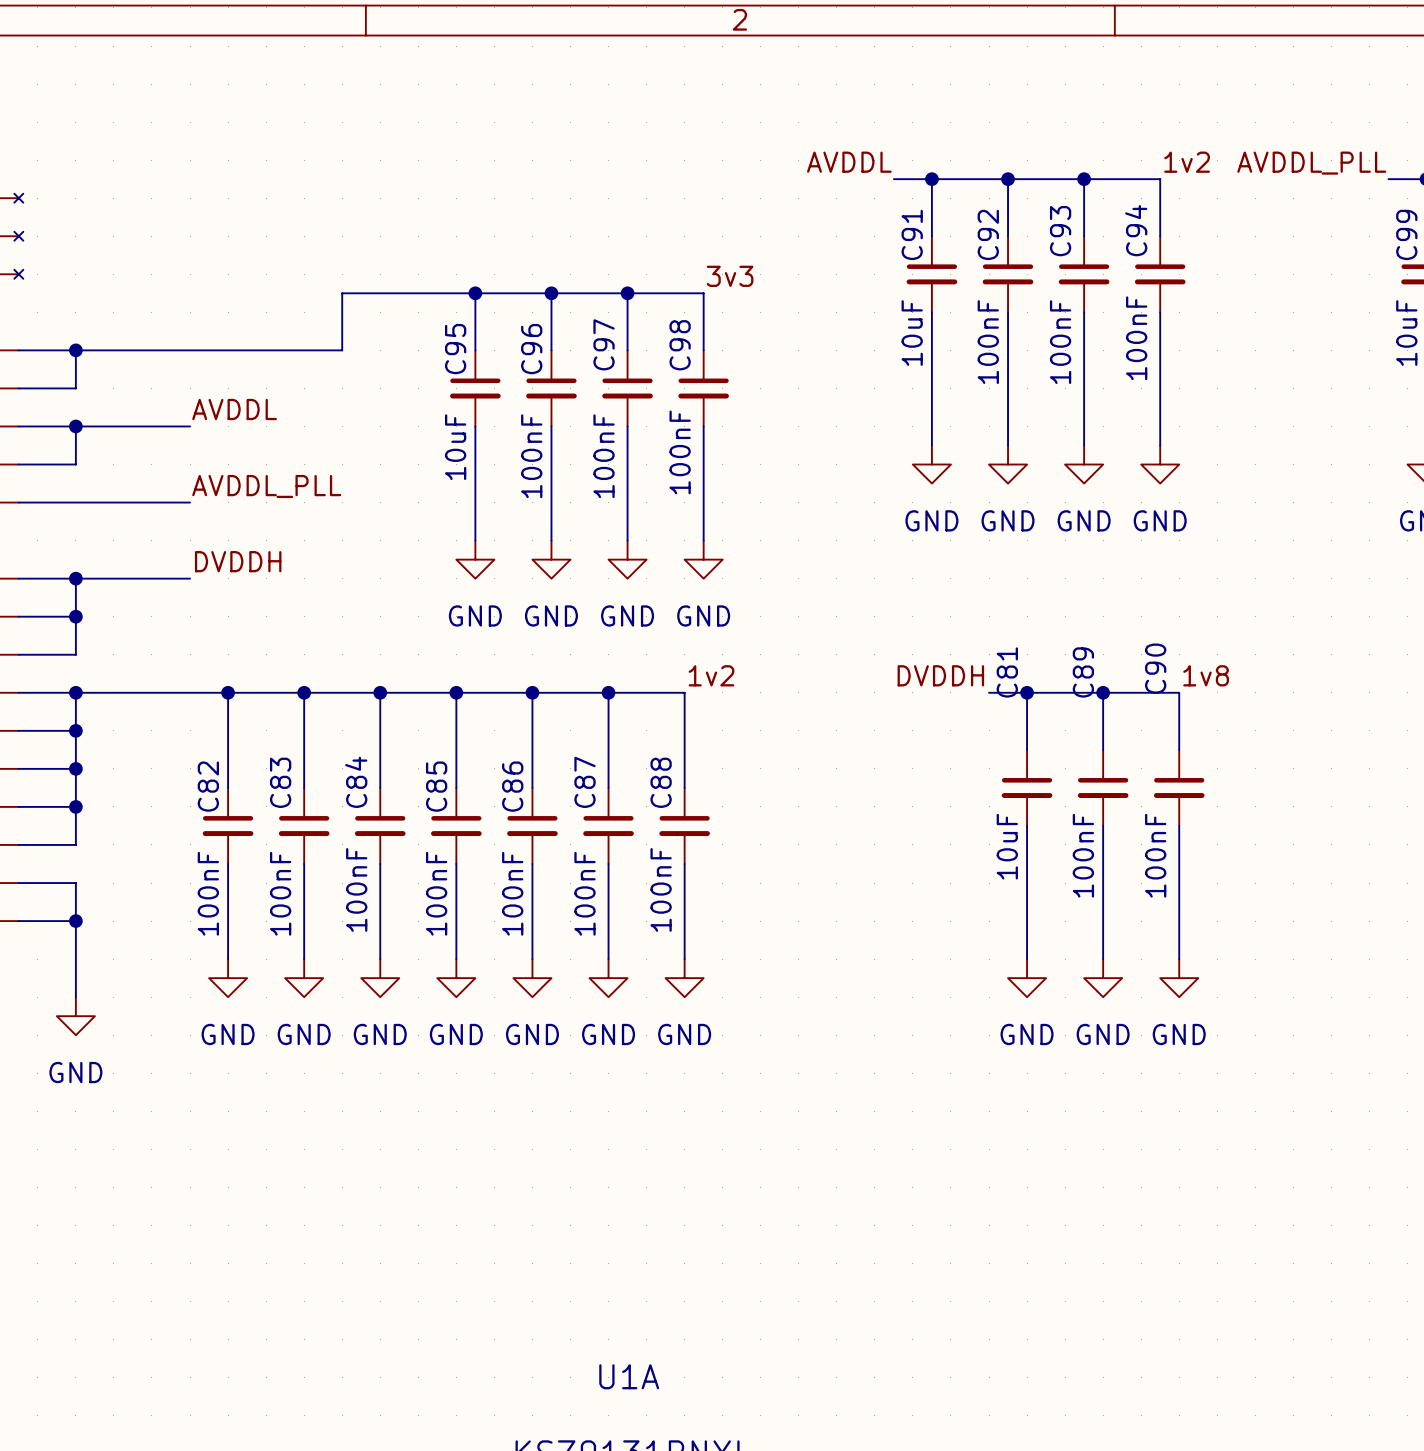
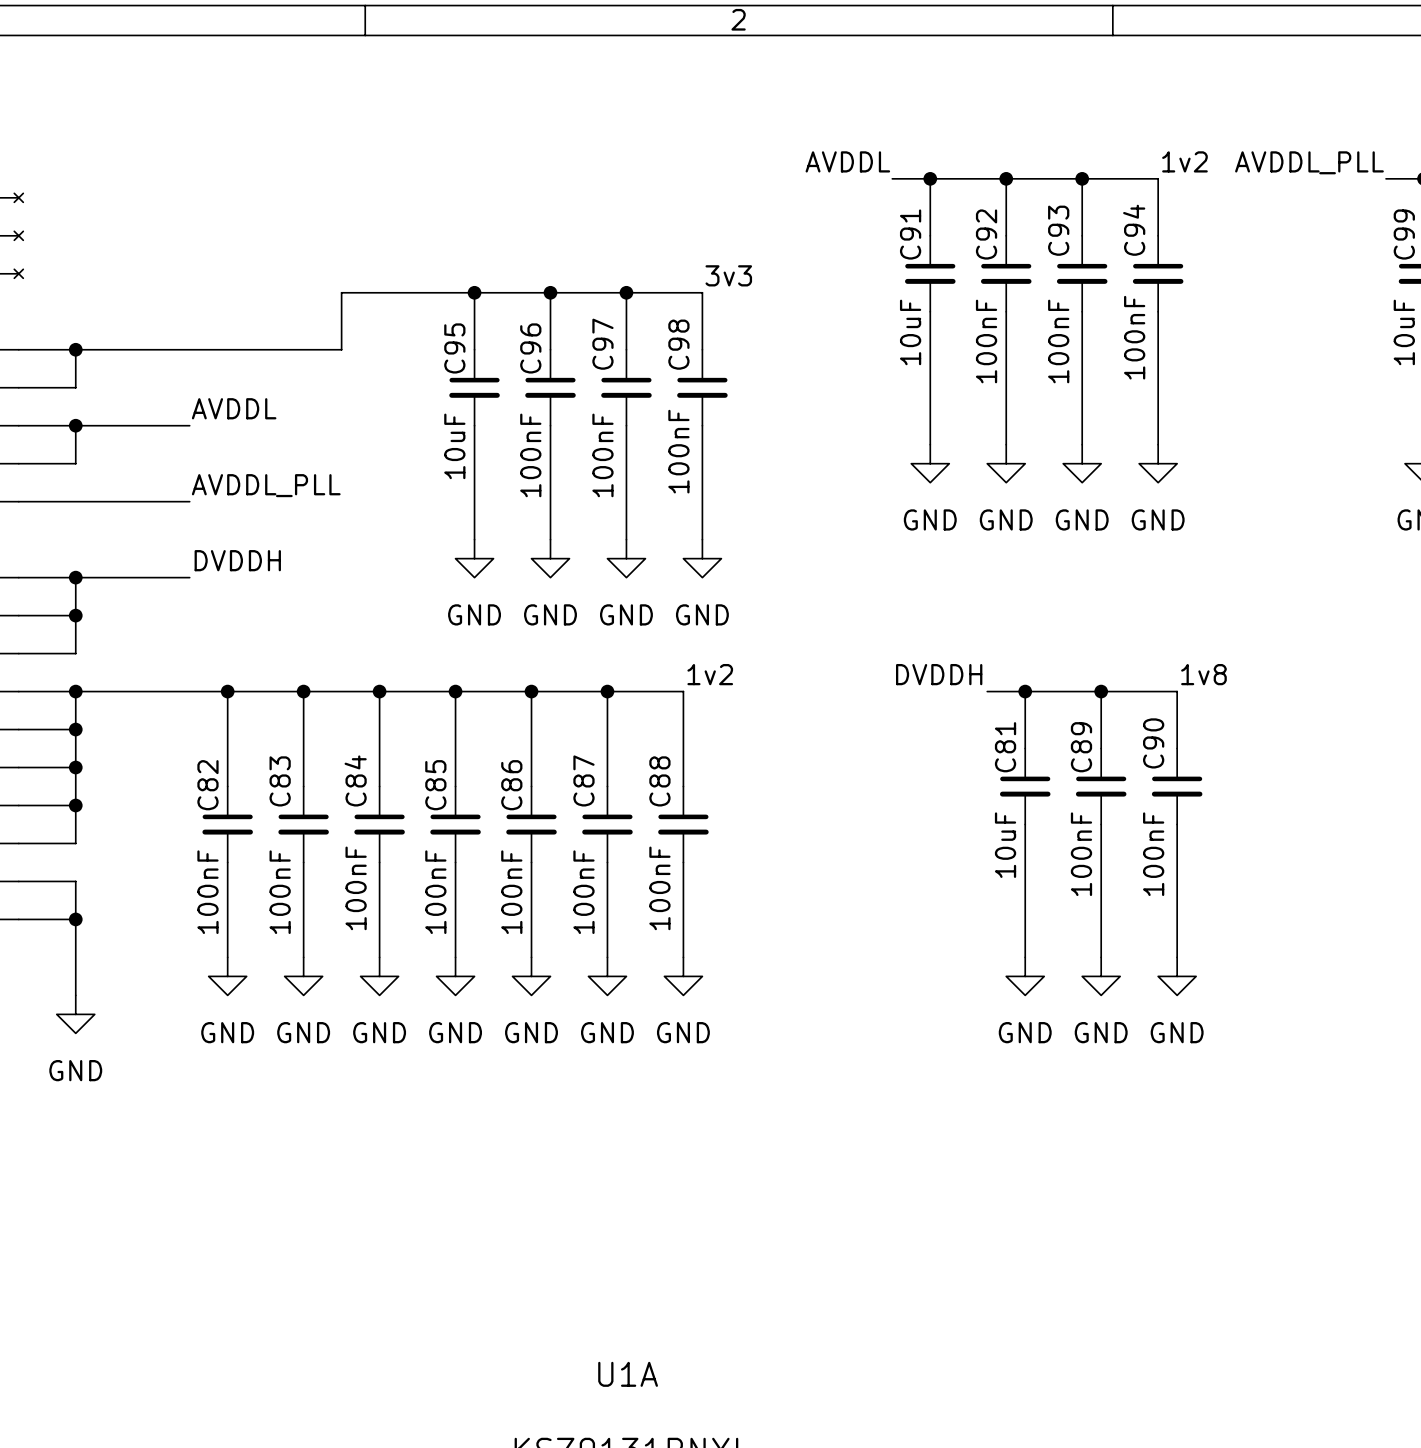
C90 name position: C90 (1155, 668) -> C90 (1153, 743)
C81 name position: C81 (1007, 672) -> C81 (1005, 747)
C89 name position: C89 (1083, 672) -> C89 (1081, 747)

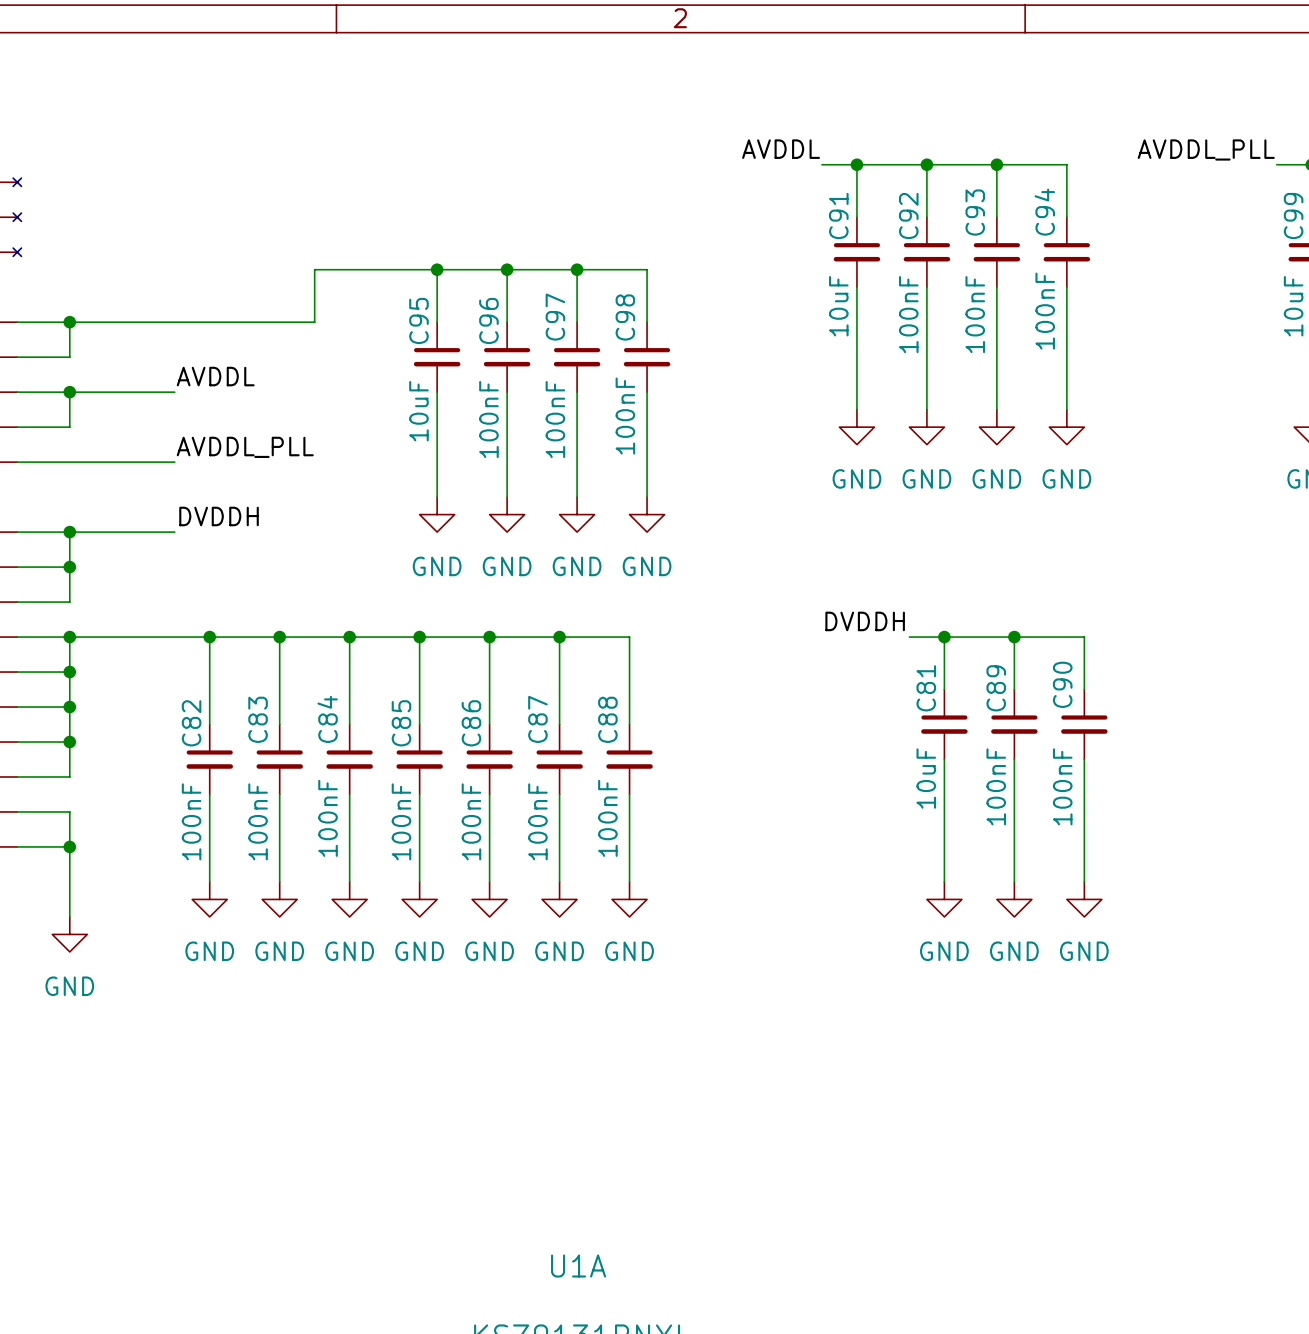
label: 1v2 (1184, 161) -> none
label: 3v3 (728, 275) -> none
label: 1v2 (710, 674) -> none
label: 1v8 (1203, 674) -> none

